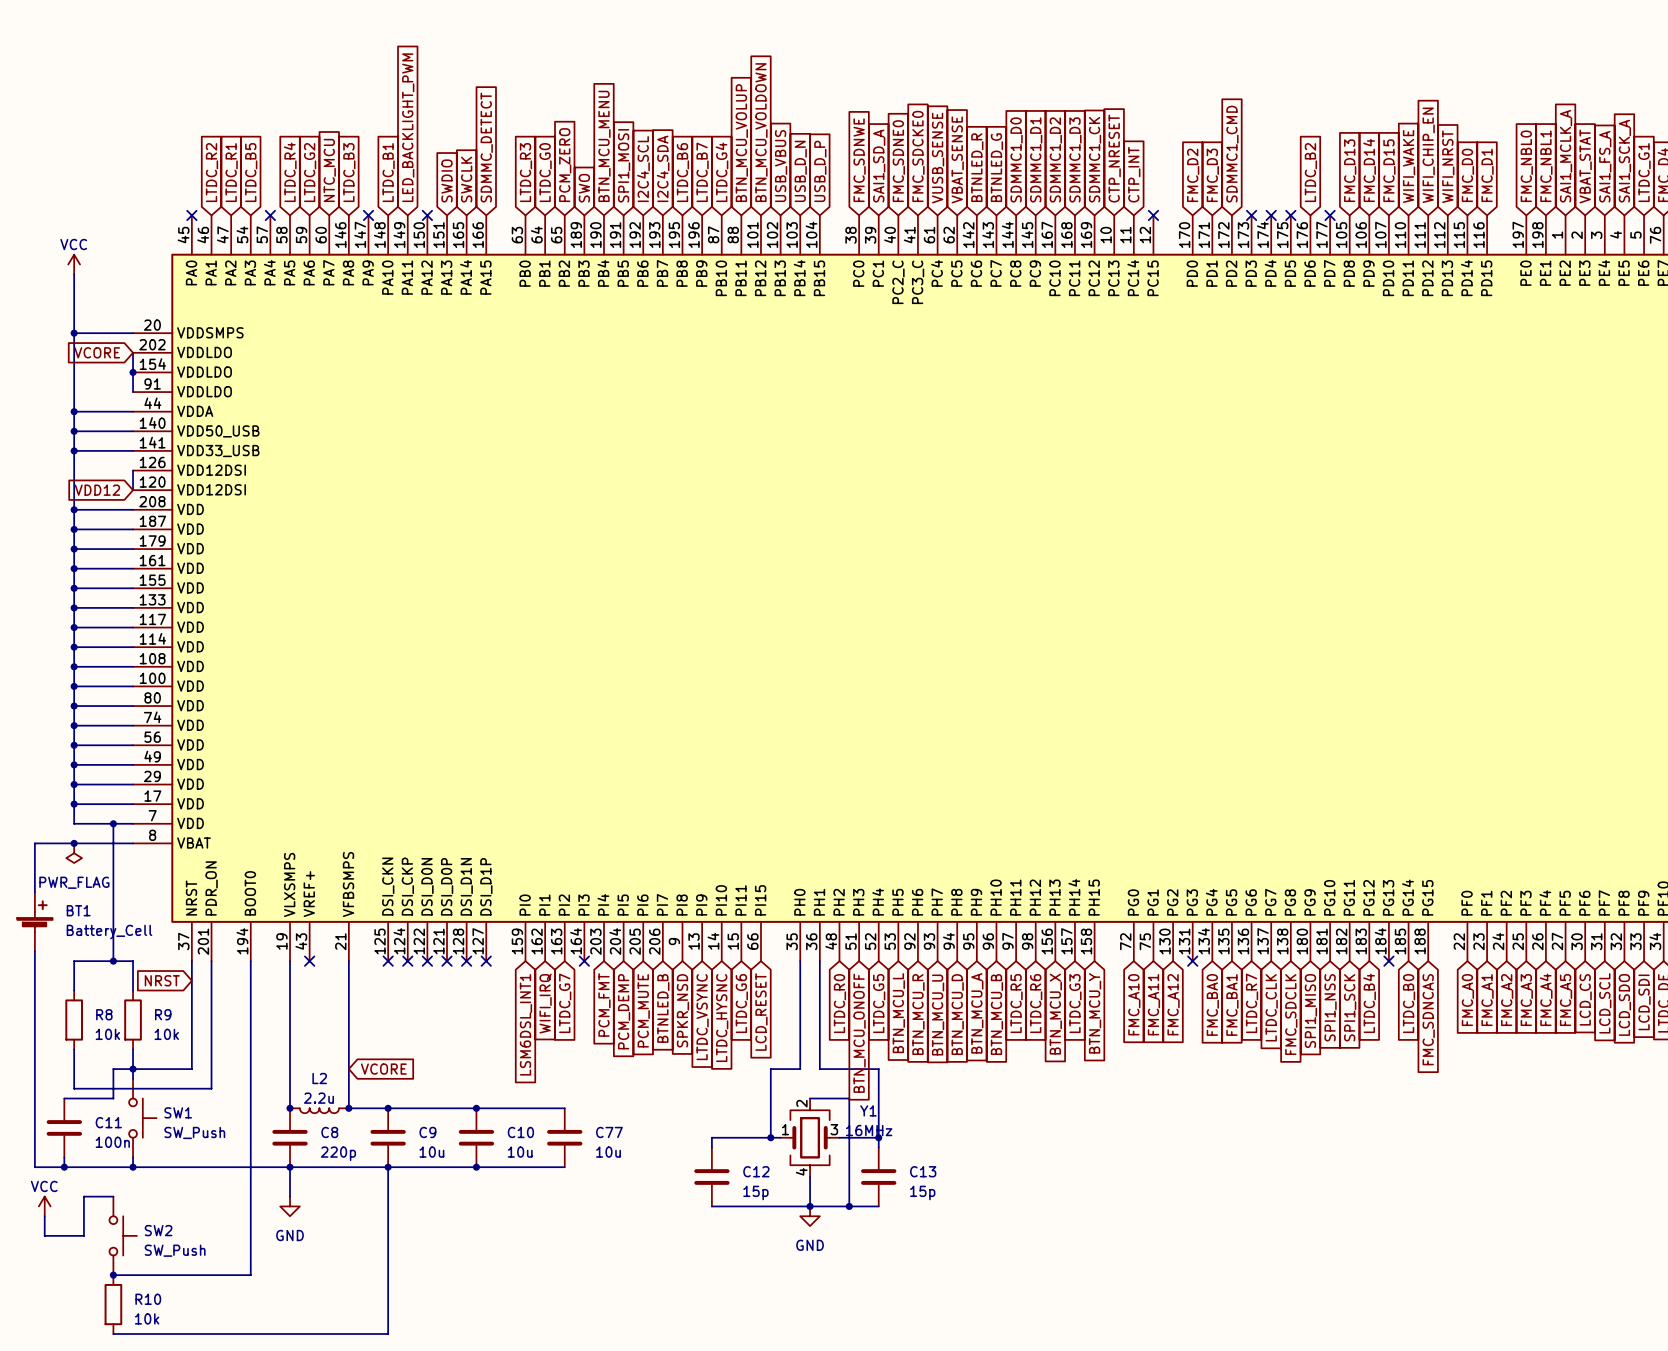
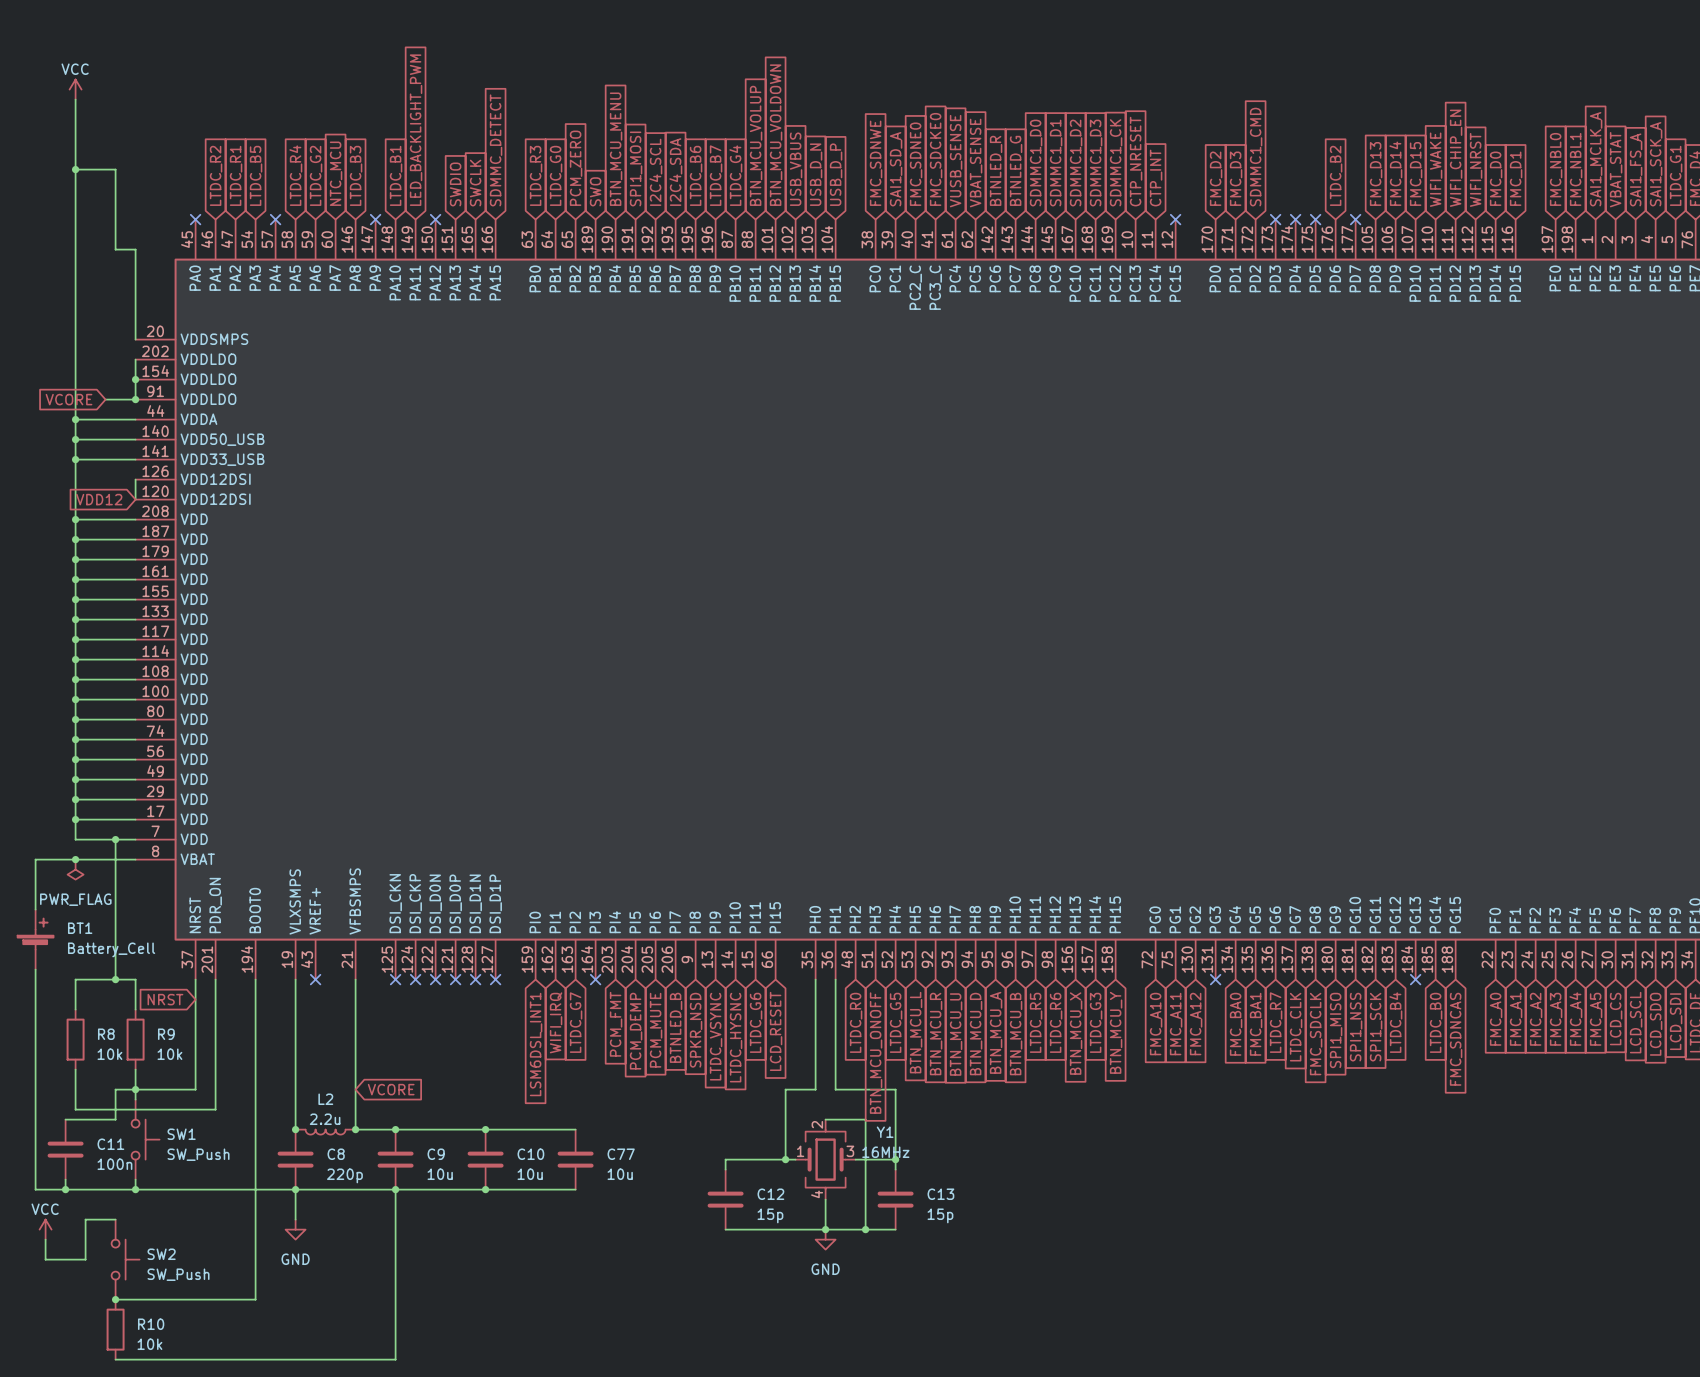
wire: none -> (75, 99) (75, 279)
junction: none -> (75, 169)
power symbol position: VCC (74, 264) -> VCC (75, 89)
wire: (74, 333) (133, 333) -> (75, 169) (115, 169) (115, 249) (135, 249) (135, 339)
junction: (74, 333) -> none
global label position: VCORE (97, 352) -> VCORE (69, 399)
wire: none -> (105, 399) (135, 399)
junction: none -> (135, 399)

